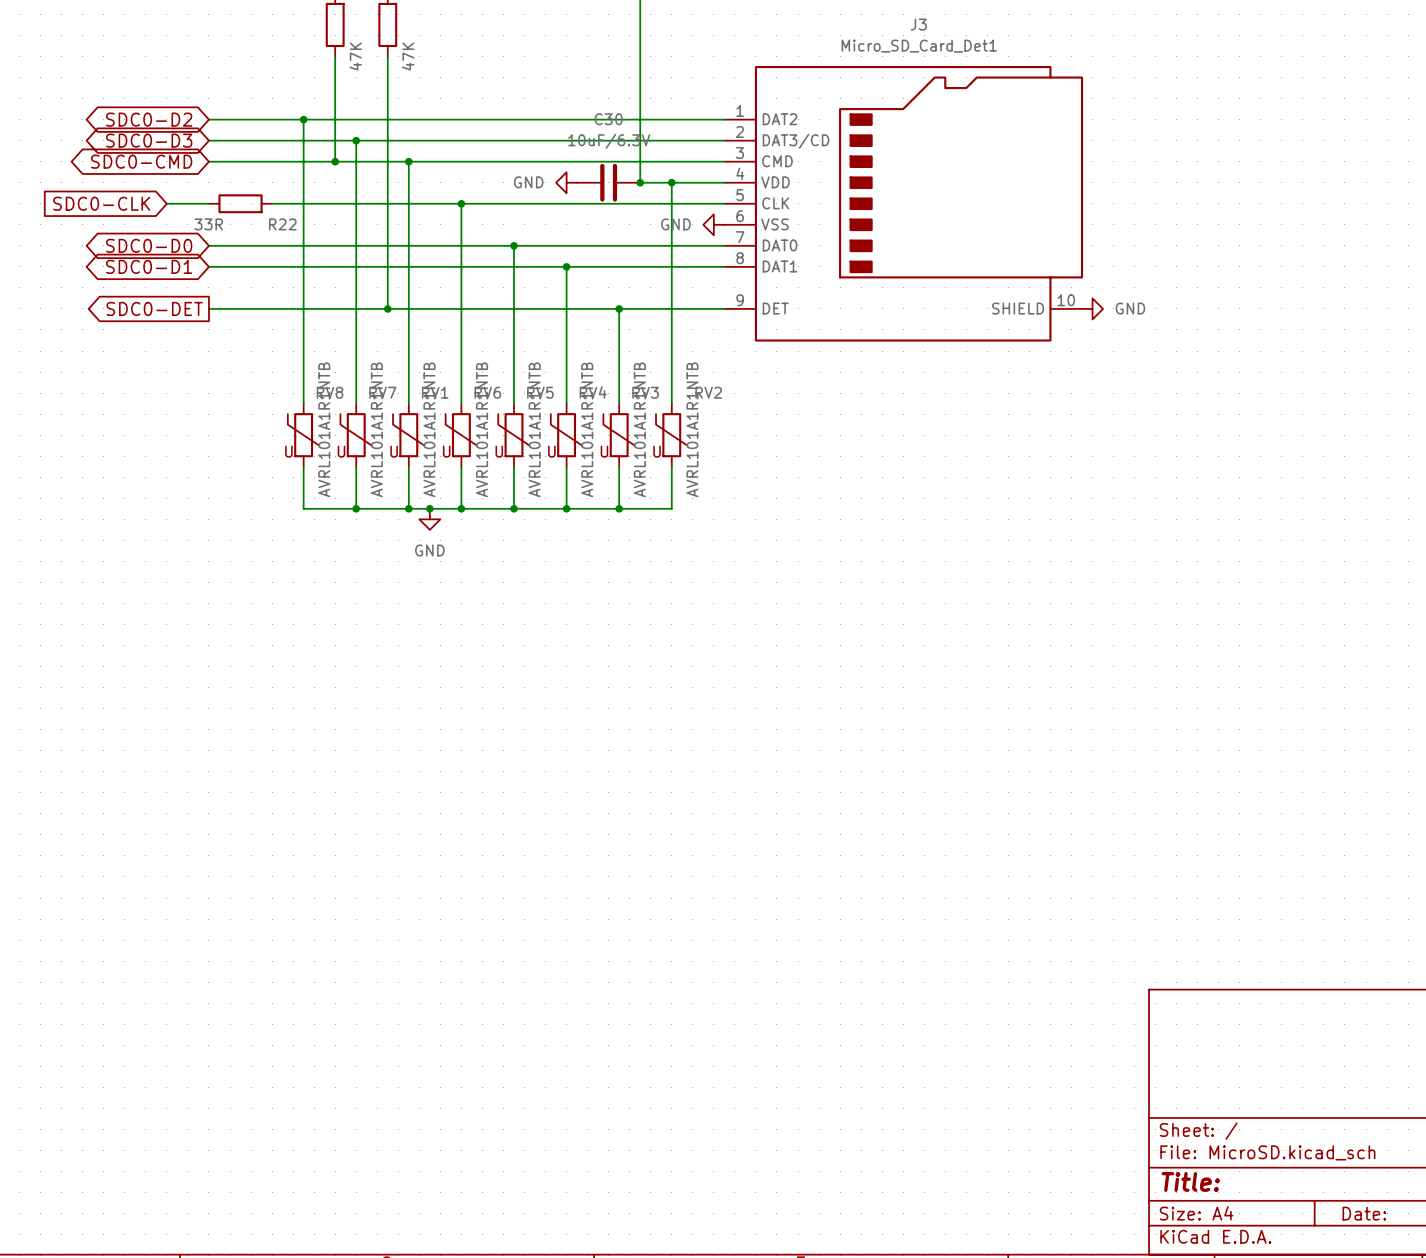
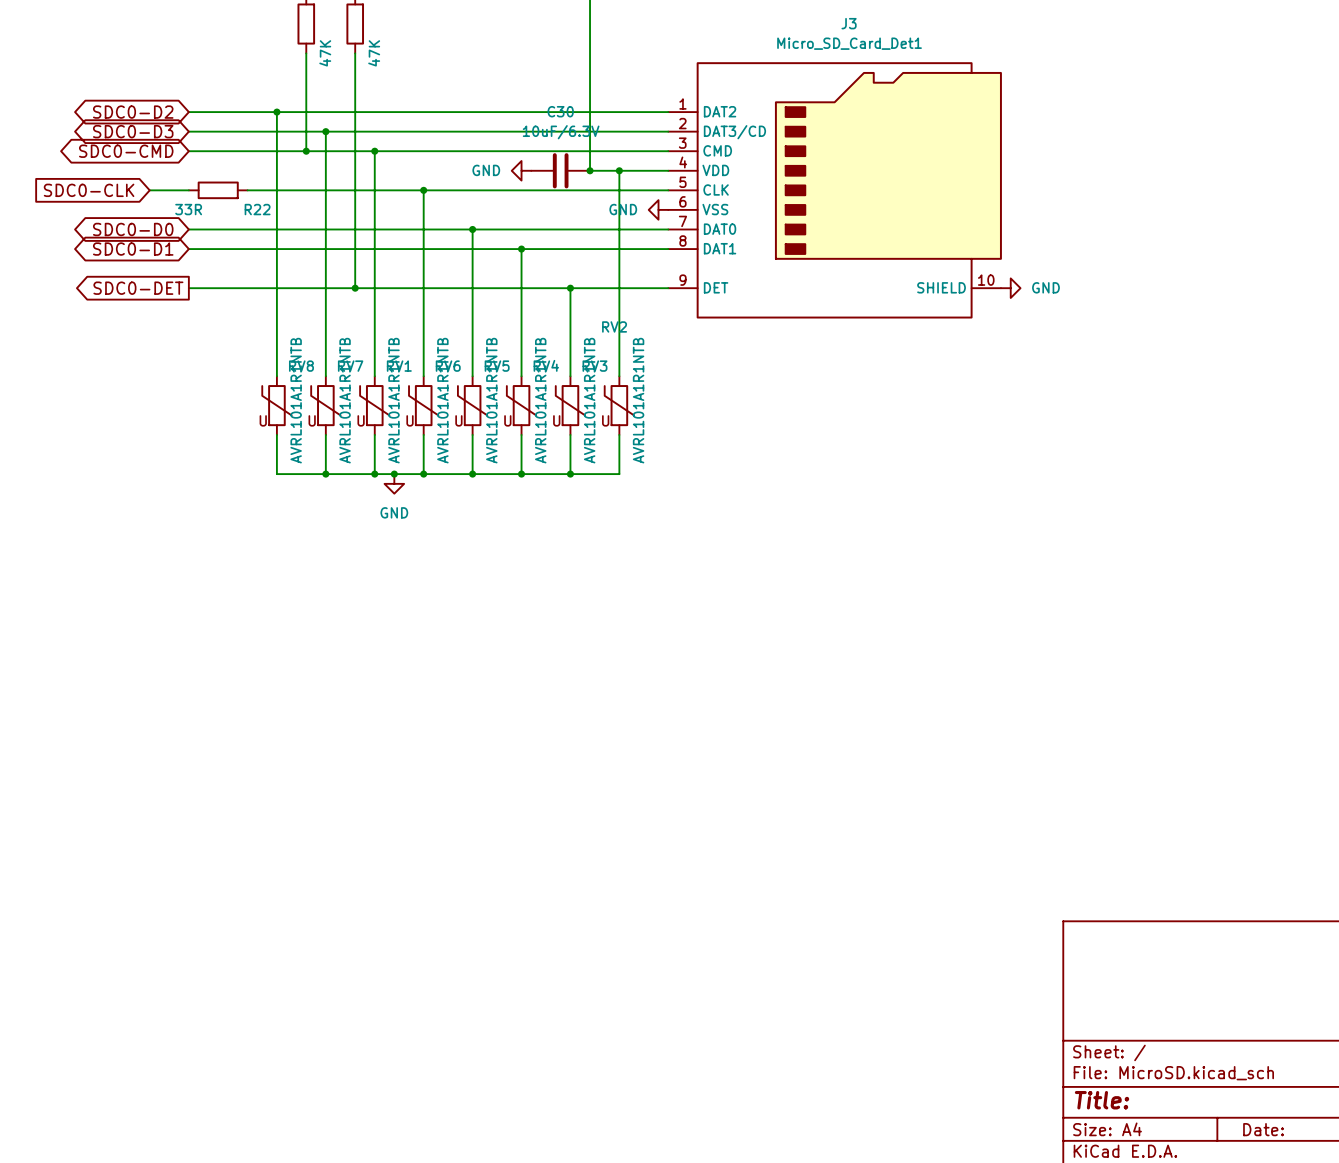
RV2 name position: RV2 (708, 392) -> RV2 (614, 326)

